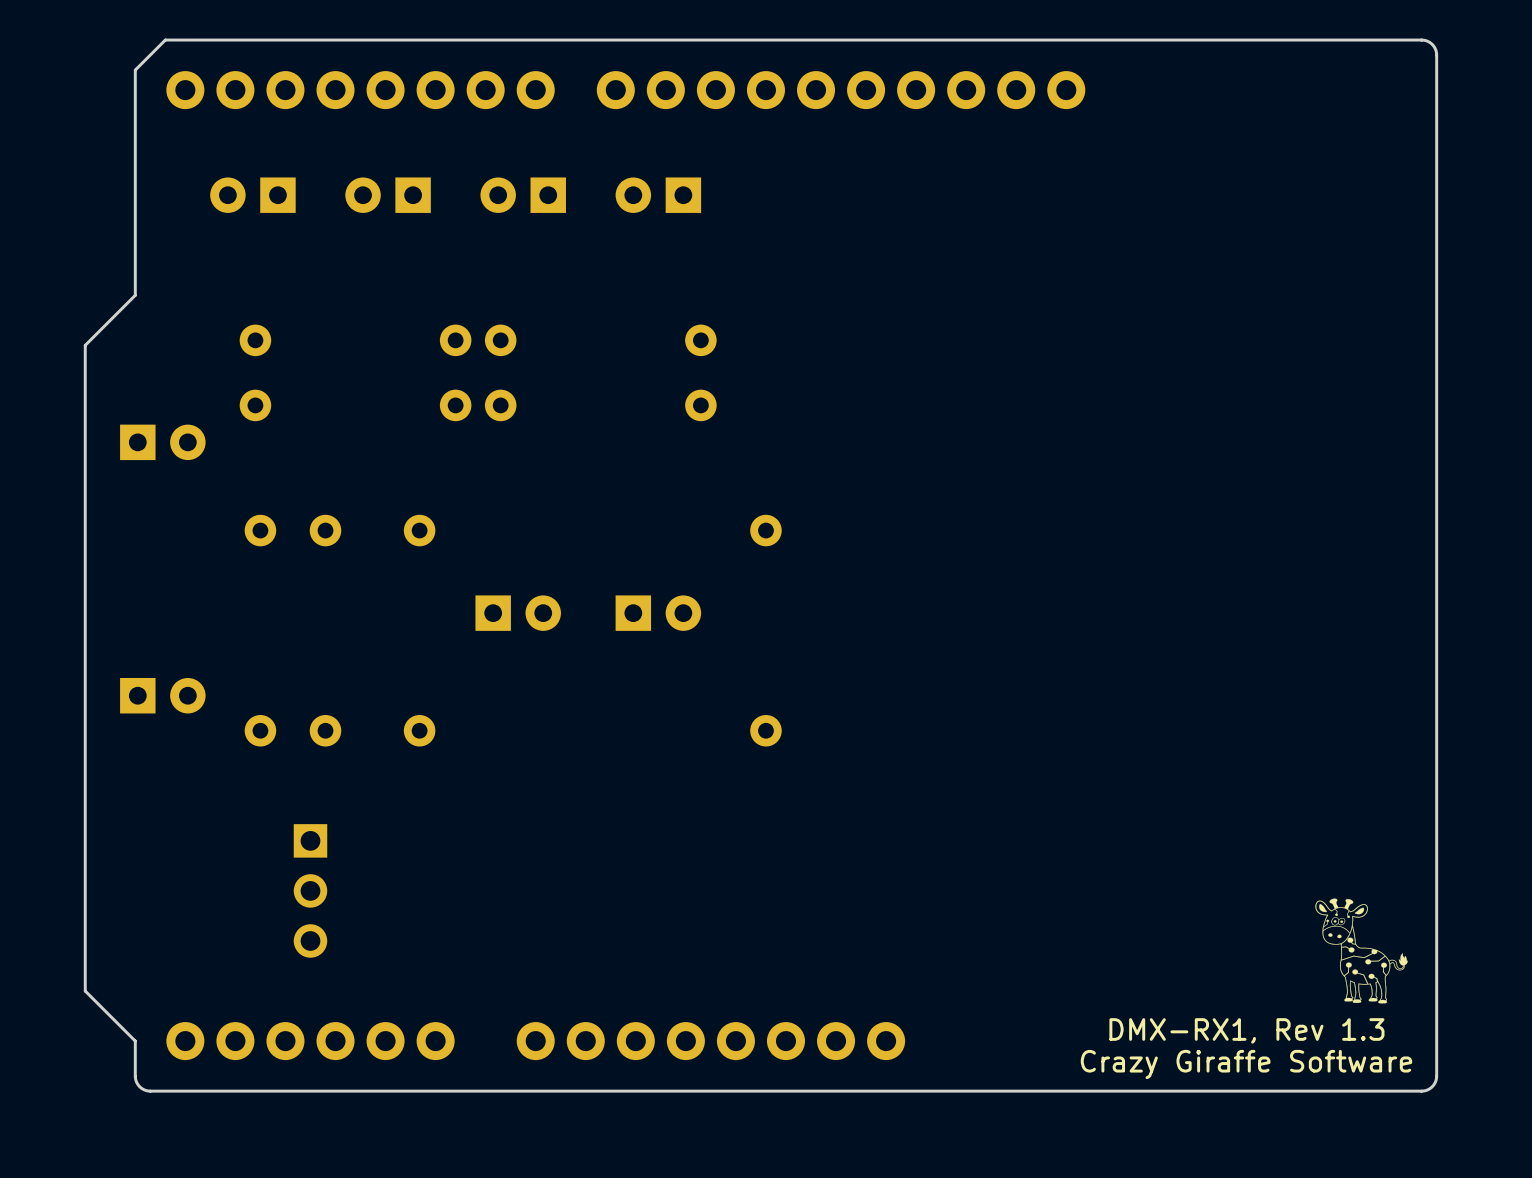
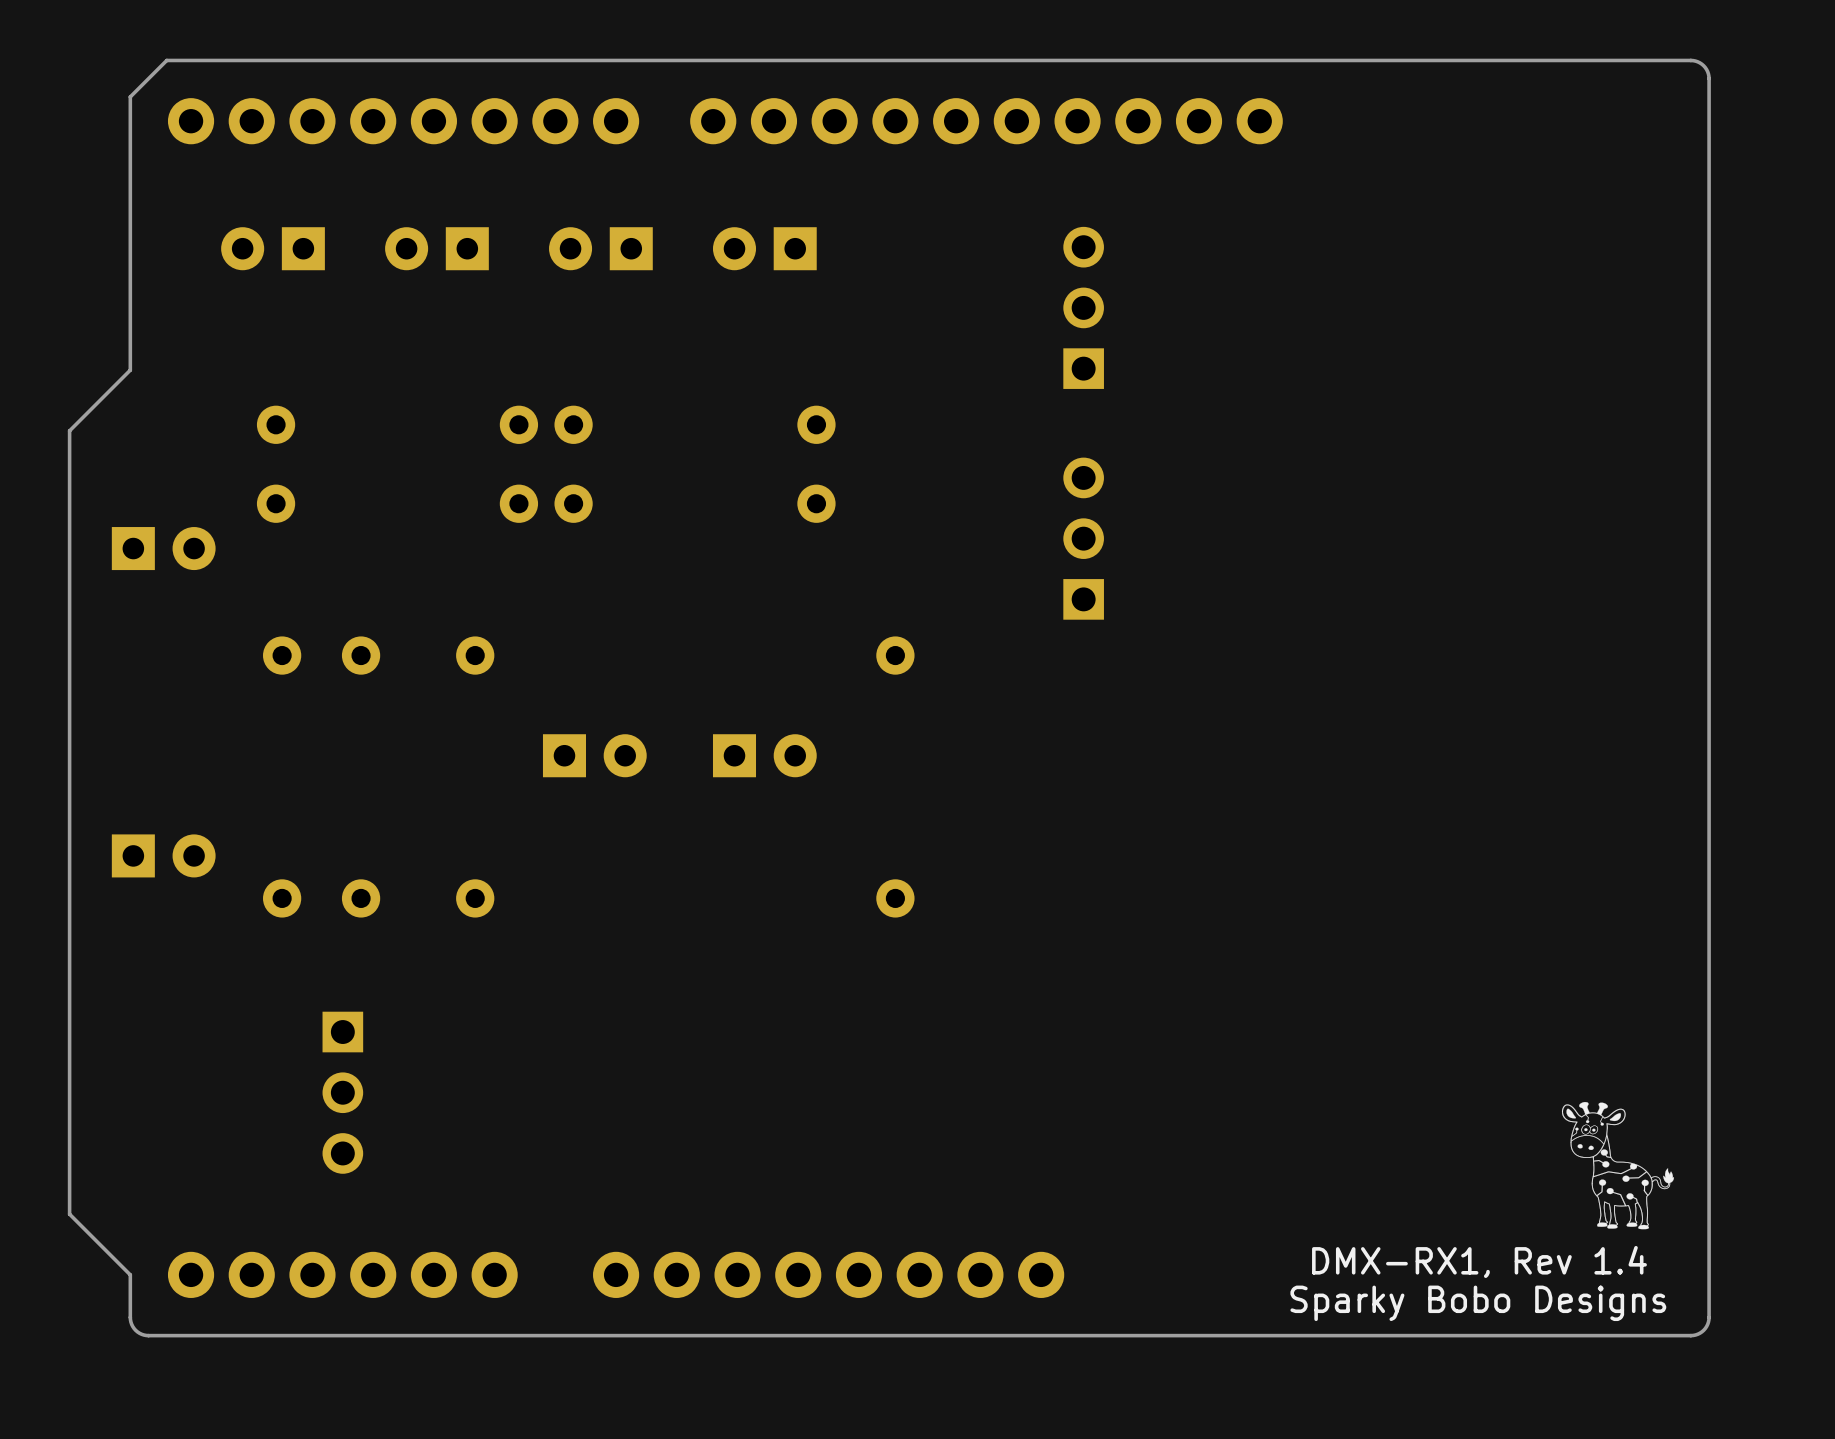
part: none -> (1083, 307)
part: none -> (1083, 538)
text: DMX-RX1, Rev 1.3 (1246, 1030) -> DMX-RX1, Rev 1.4 (1479, 1261)
text: Crazy Giraffe Software (1246, 1064) -> Sparky Bobo Designs (1478, 1303)

